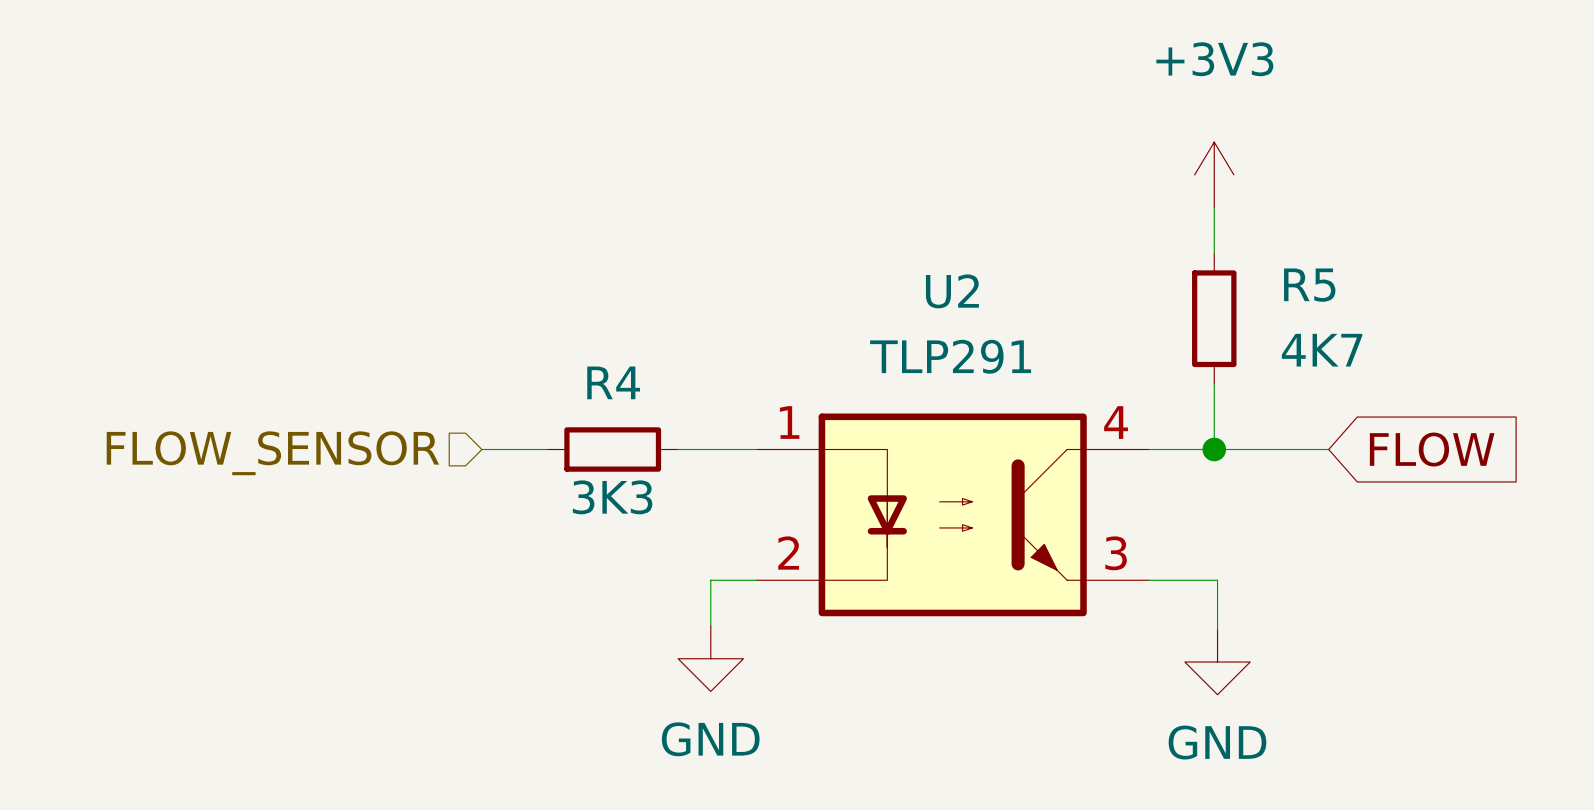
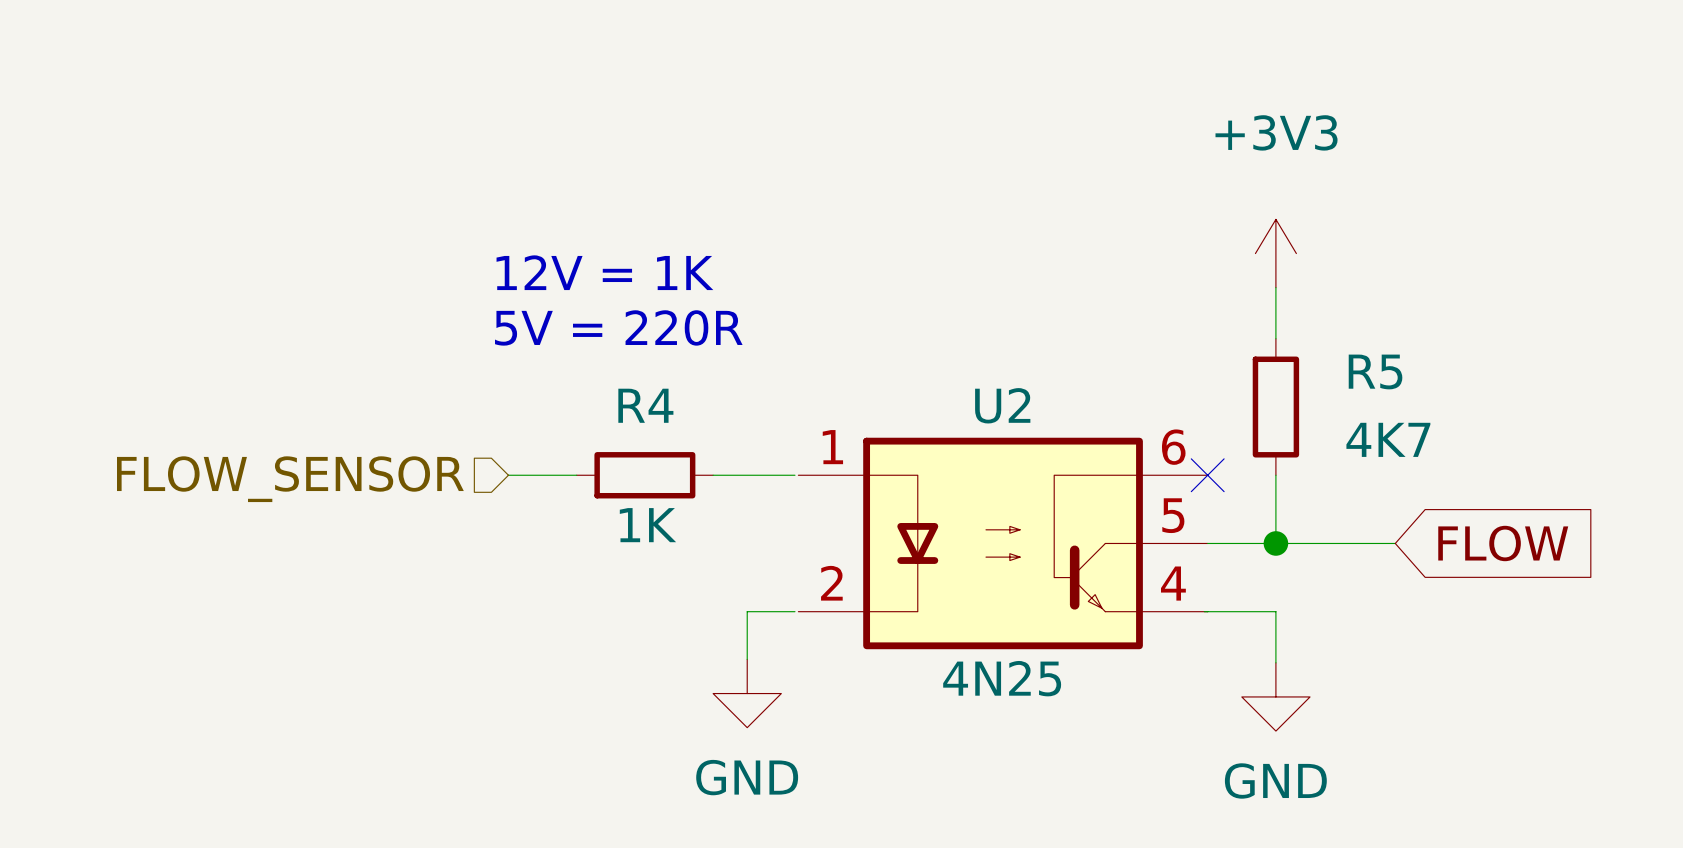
power symbol position: +3V3 (1214, 174) -> +3V3 (1275, 253)
wire: (1214, 207) (1214, 253) -> none
text: none -> 12V = 1K (604, 272)
wire: none -> (1275, 287) (1275, 338)
U2 name position: U2 (952, 291) -> U2 (1002, 405)
text: none -> 5V = 220R (618, 327)
R5 position: (1214, 318) -> (1275, 407)
U2 value: TLP291 (950, 356) -> 4N25 (1002, 678)
wire: (1214, 384) (1214, 449) -> (1275, 475) (1275, 543)
U2 symbol: [756, 413, 1149, 617] -> [798, 437, 1208, 650]
wire: (1148, 449) (1328, 449) -> (1207, 543) (1395, 543)
no-connect mark: none -> (1207, 475)
junction position: (1214, 449) -> (1275, 543)
global label position: FLOW (1432, 449) -> FLOW (1503, 543)
R4 value: 3K3 (612, 497) -> 1K (647, 525)

